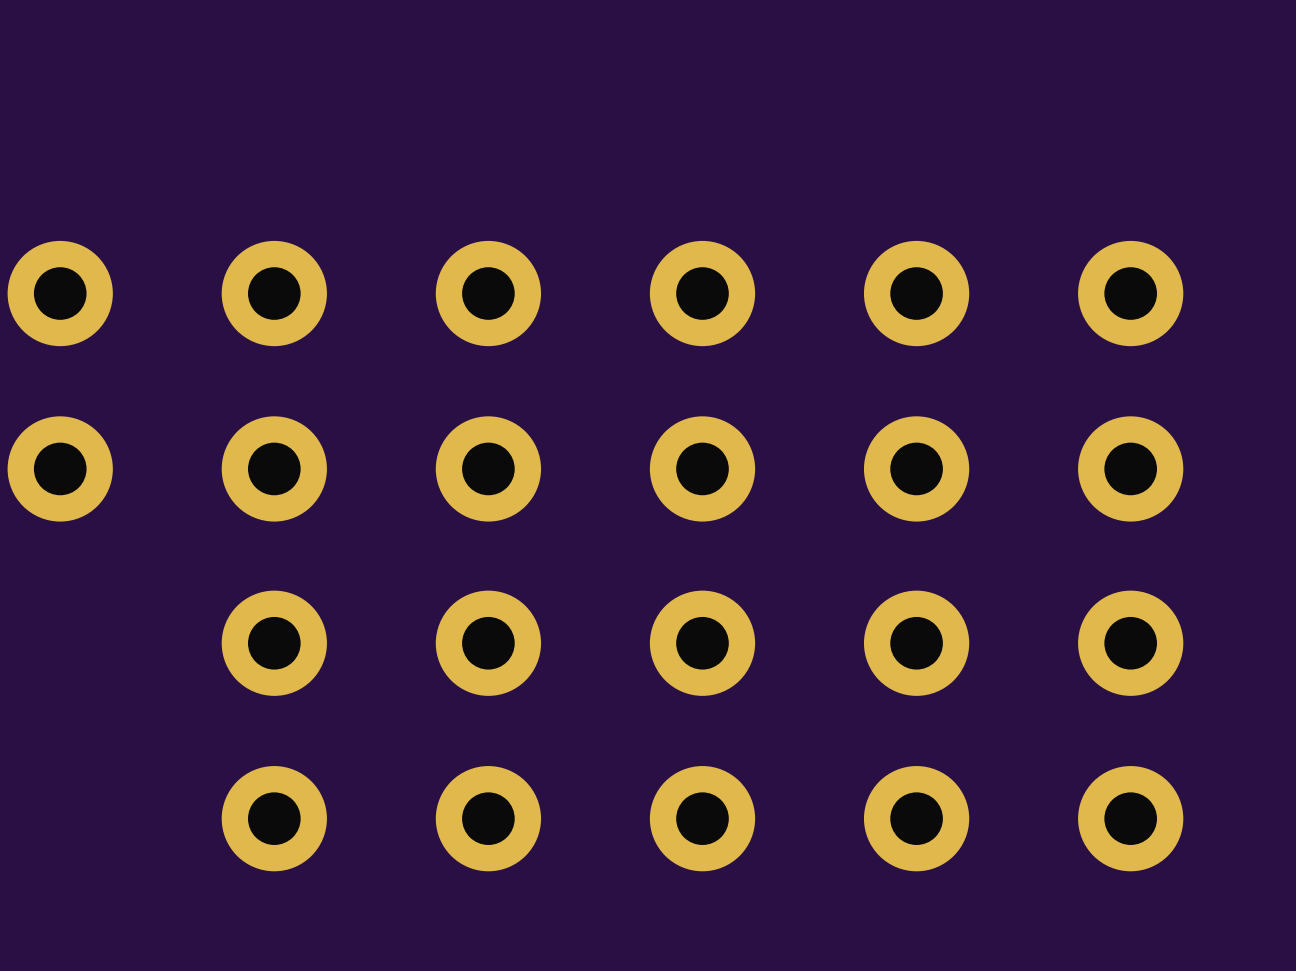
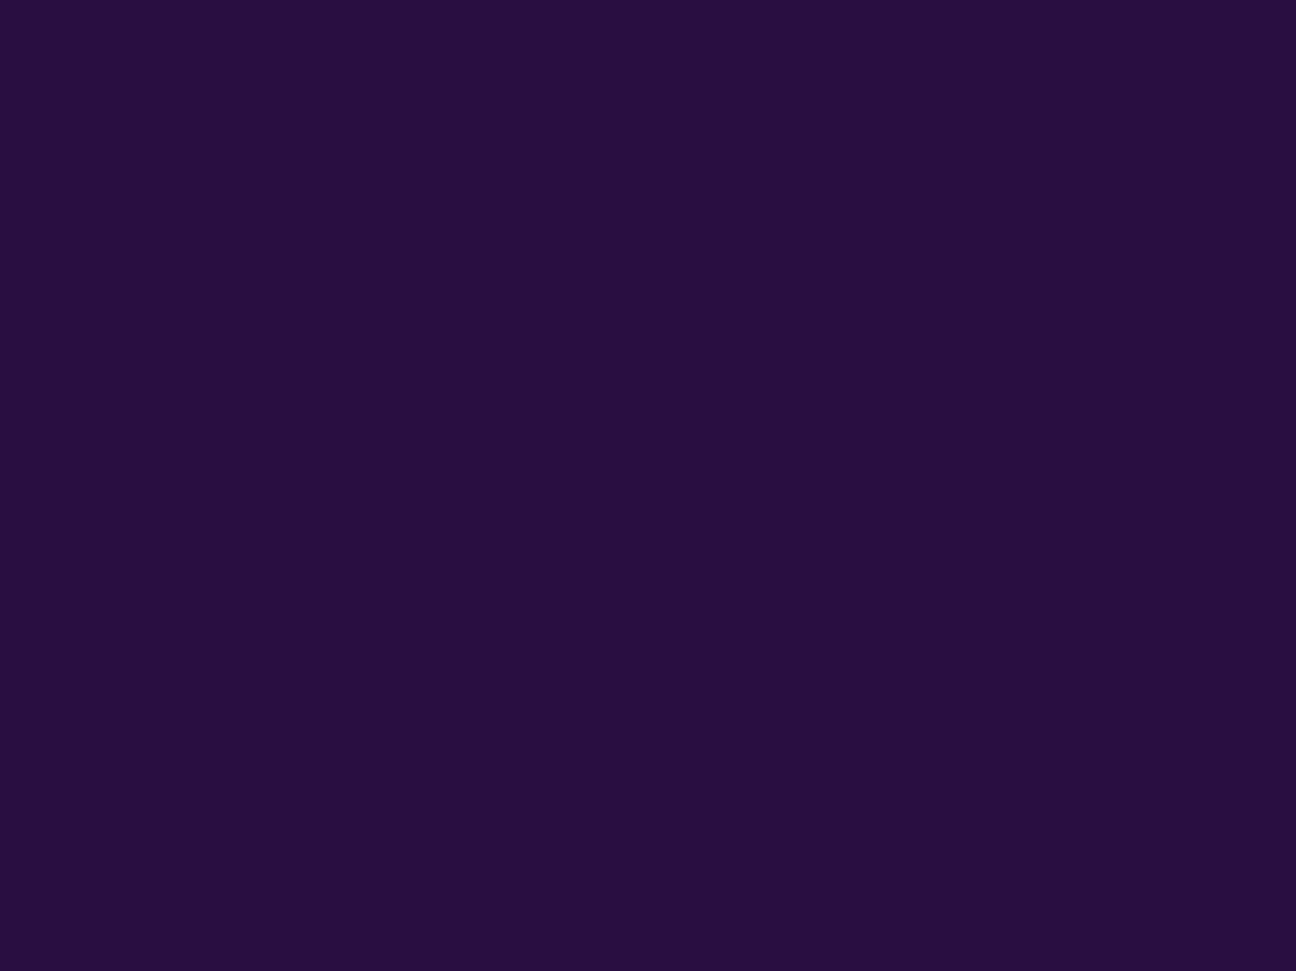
part: (60, 381) -> none
part: (274, 381) -> none
part: (488, 381) -> none
part: (702, 381) -> none
part: (916, 381) -> none
part: (1130, 381) -> none
part: (274, 730) -> none
part: (488, 730) -> none
part: (702, 730) -> none
part: (916, 730) -> none
part: (1130, 730) -> none

